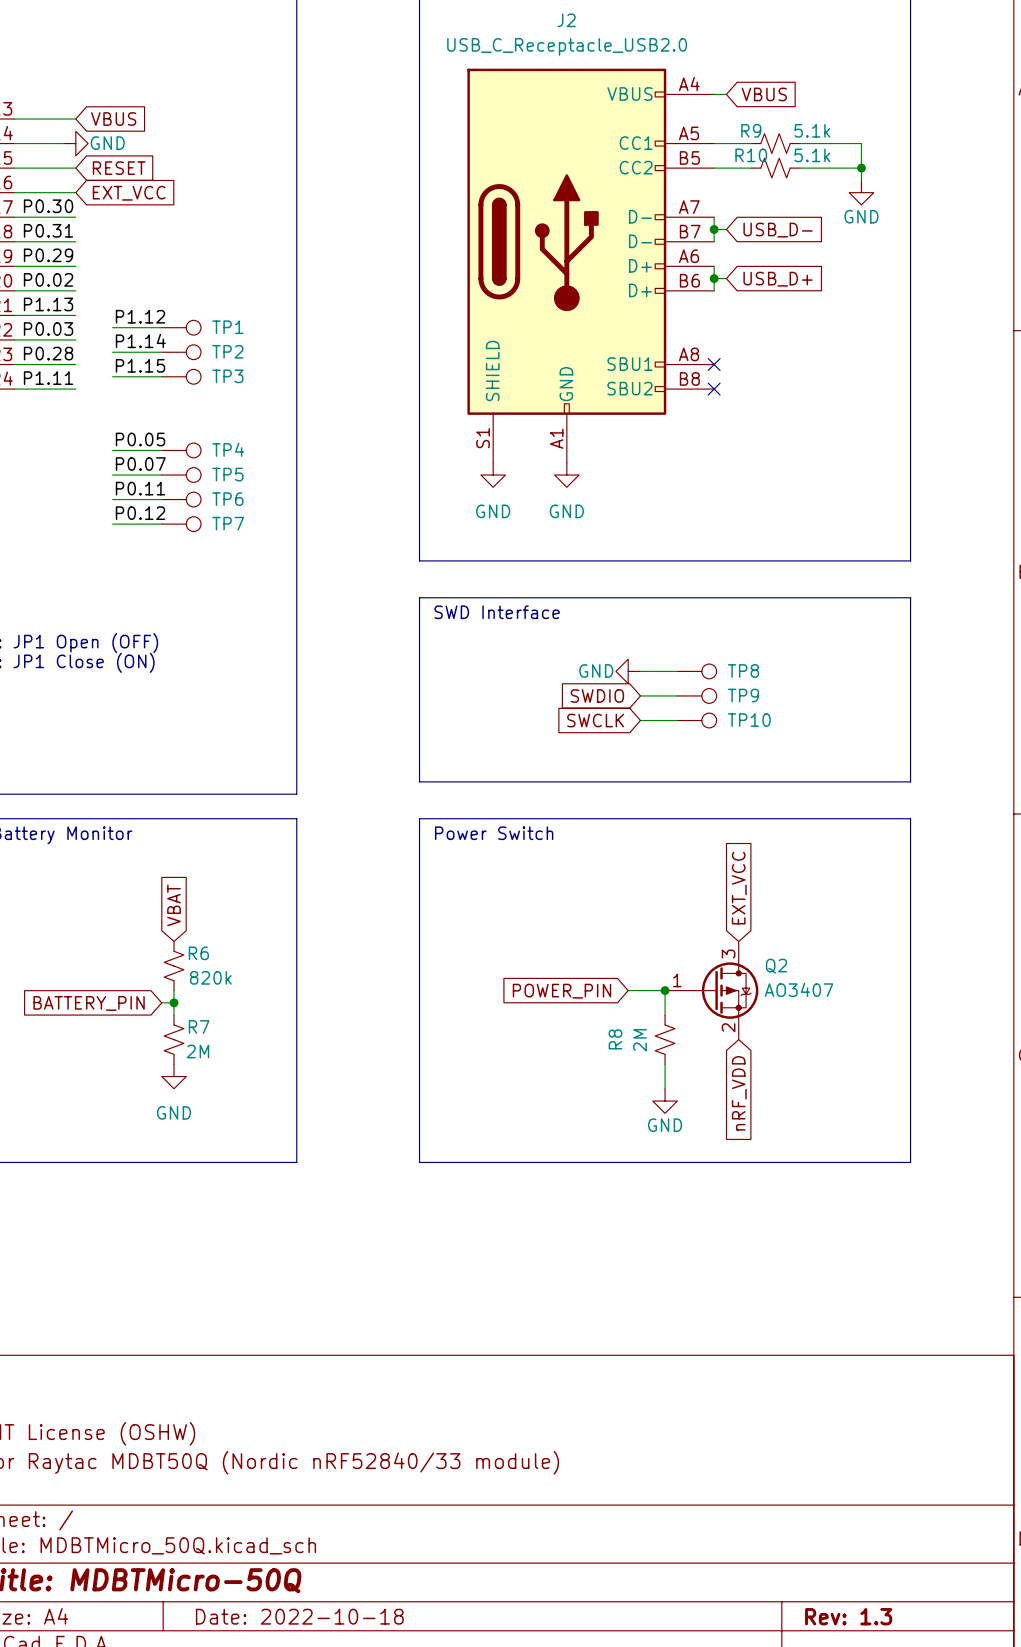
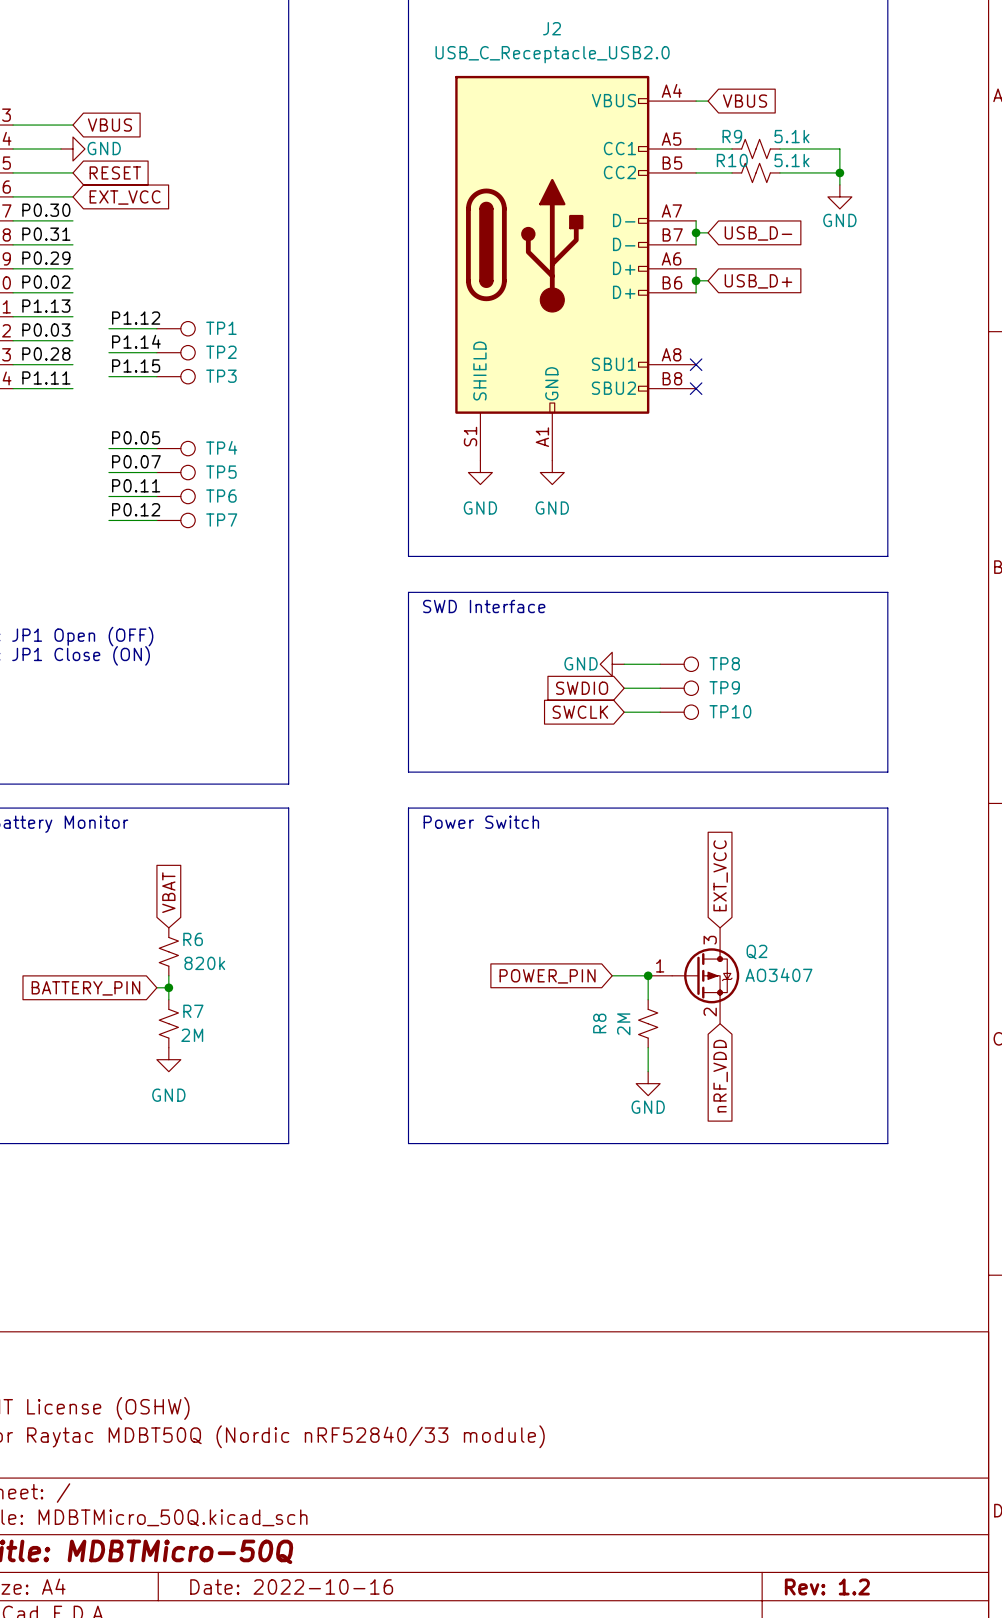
title block: Date: 2022-10-18 (299, 1616) -> Date: 2022-10-16 (291, 1586)
title block: Rev: 1.3 (848, 1616) -> Rev: 1.2 (827, 1586)

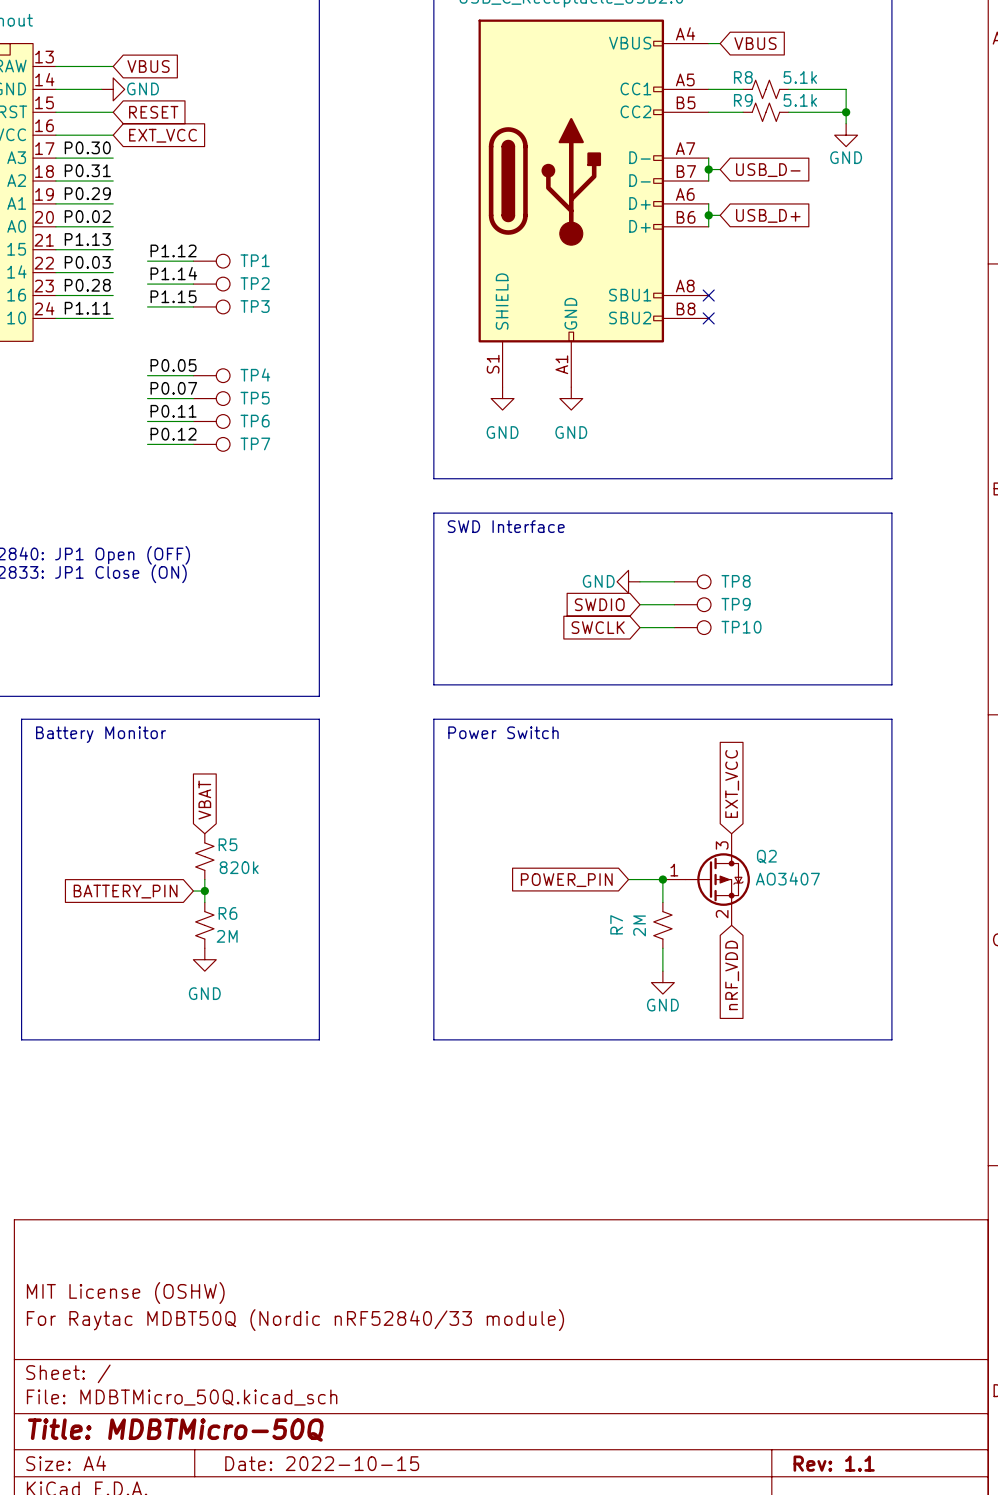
R9 name: R9 (732, 136) -> R8 (743, 77)
R10 name: R10 (732, 160) -> R9 (743, 100)
R6 name: R6 (193, 939) -> R5 (228, 844)
R7 name: R7 (193, 1011) -> R6 (228, 913)
R8 name: R8 (599, 1023) -> R7 (616, 924)
title block: Date: 2022-10-16 (291, 1586) -> Date: 2022-10-15 (322, 1463)
title block: Rev: 1.2 (827, 1586) -> Rev: 1.1 (834, 1463)

